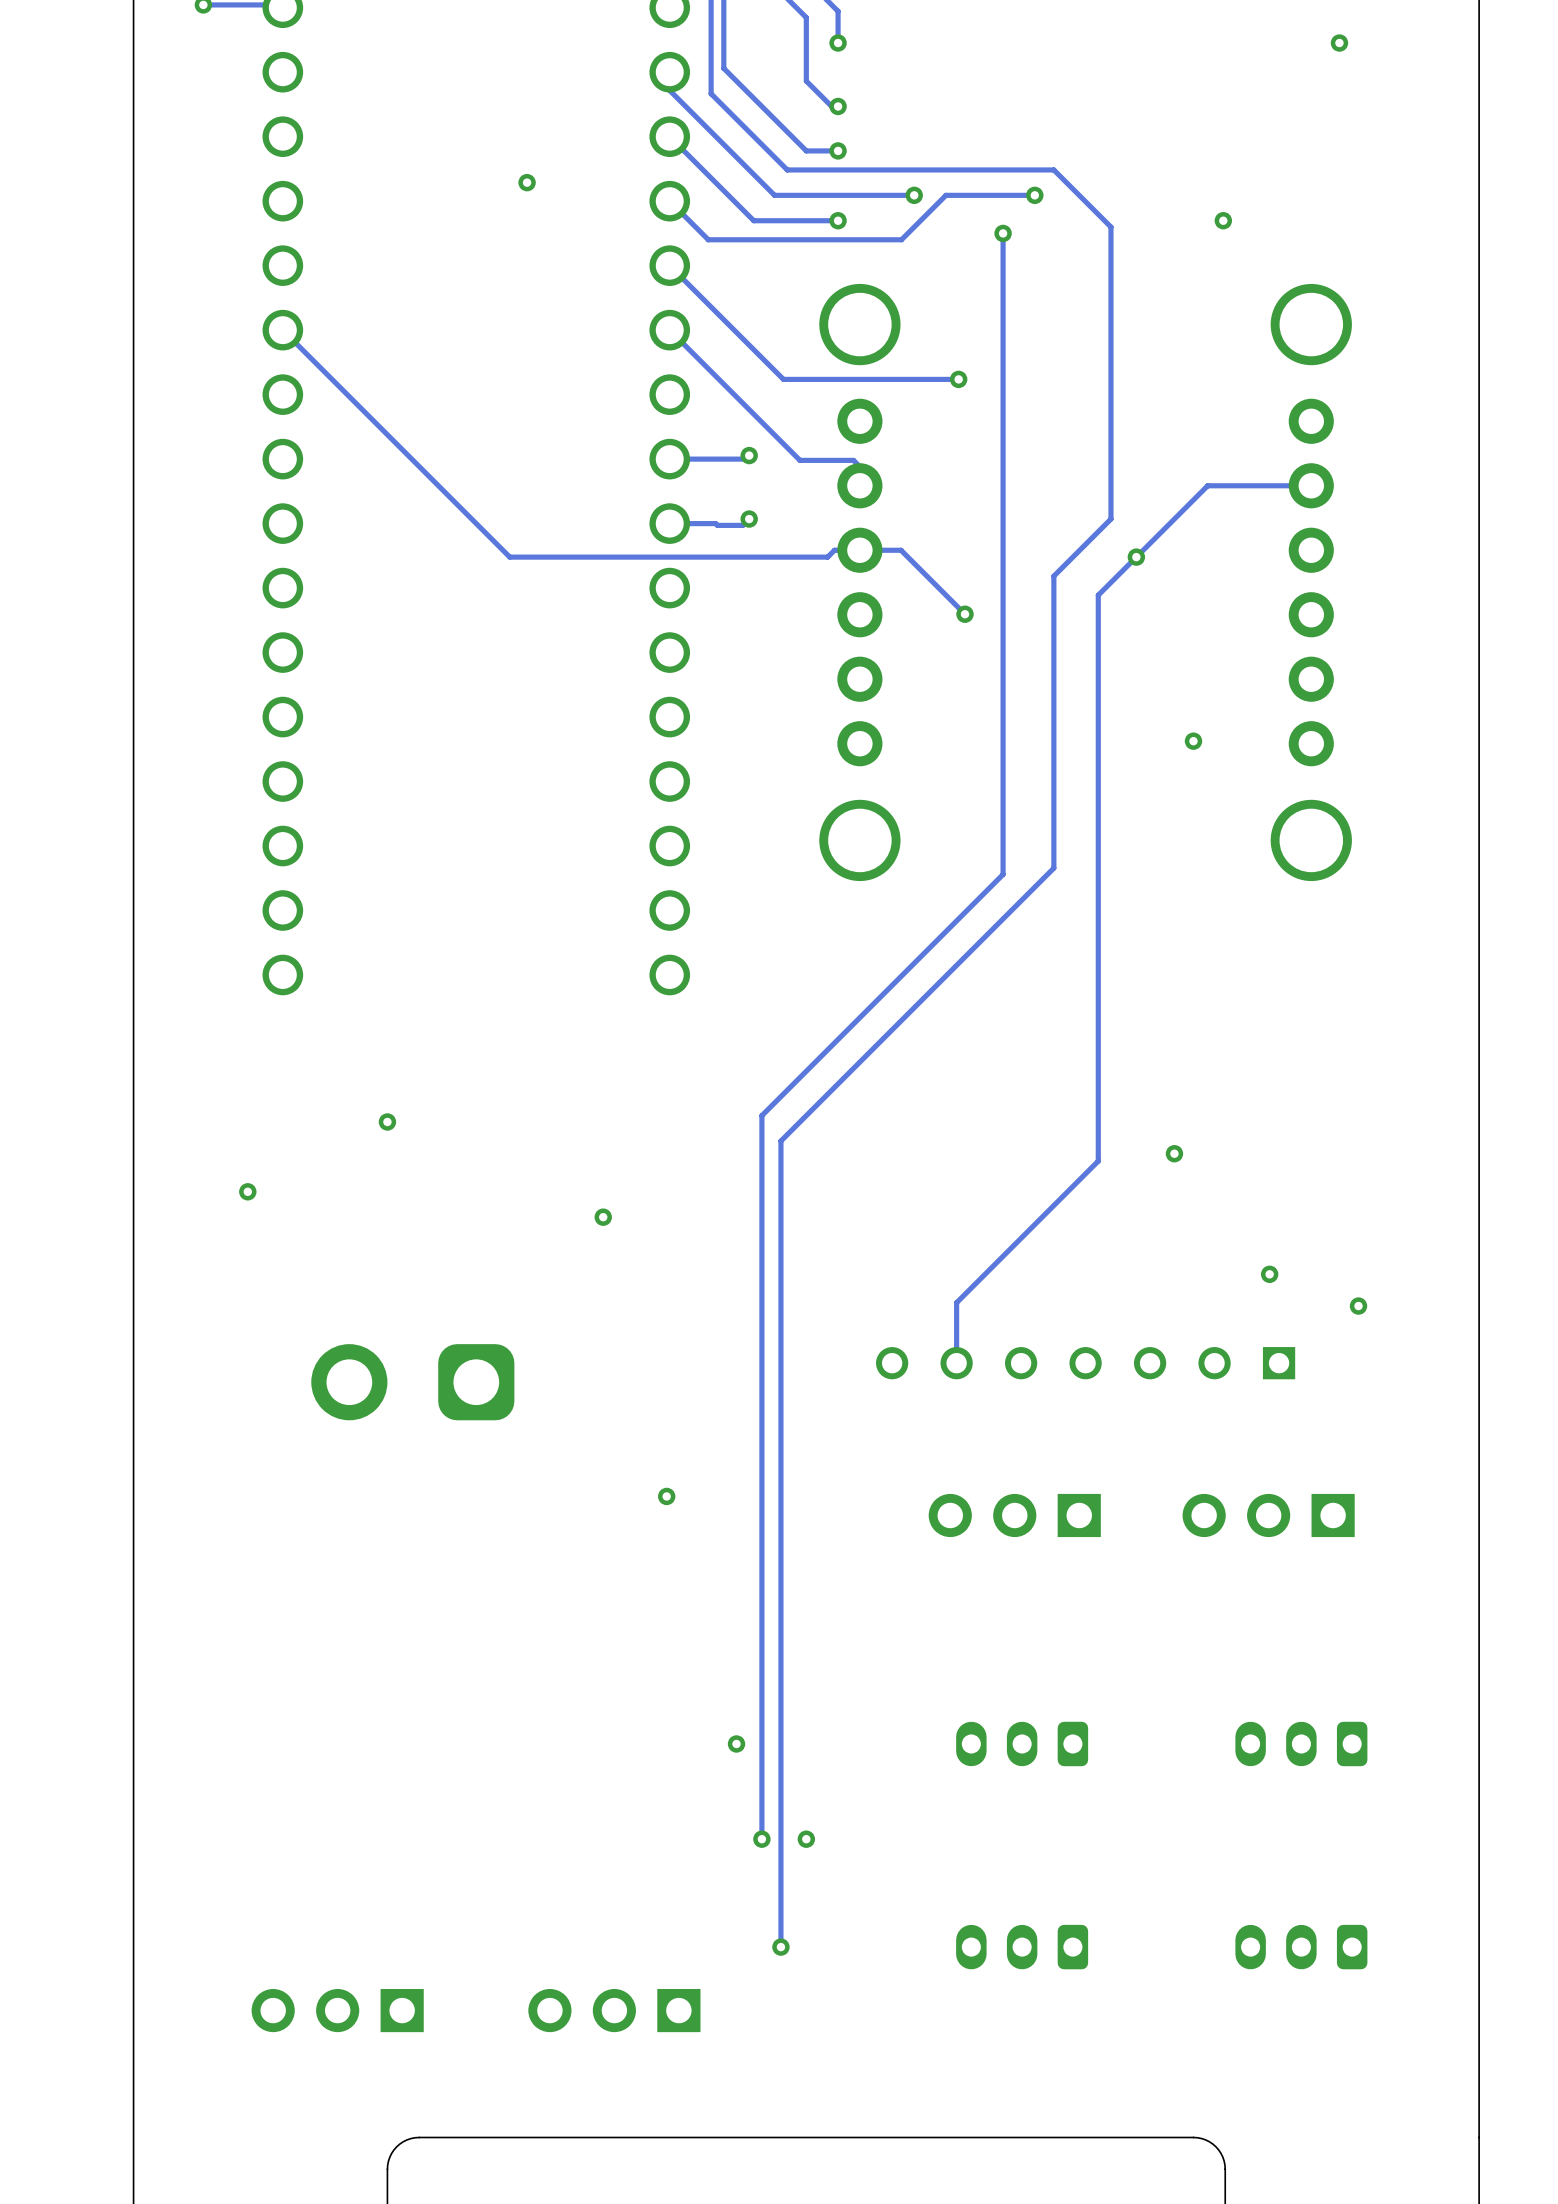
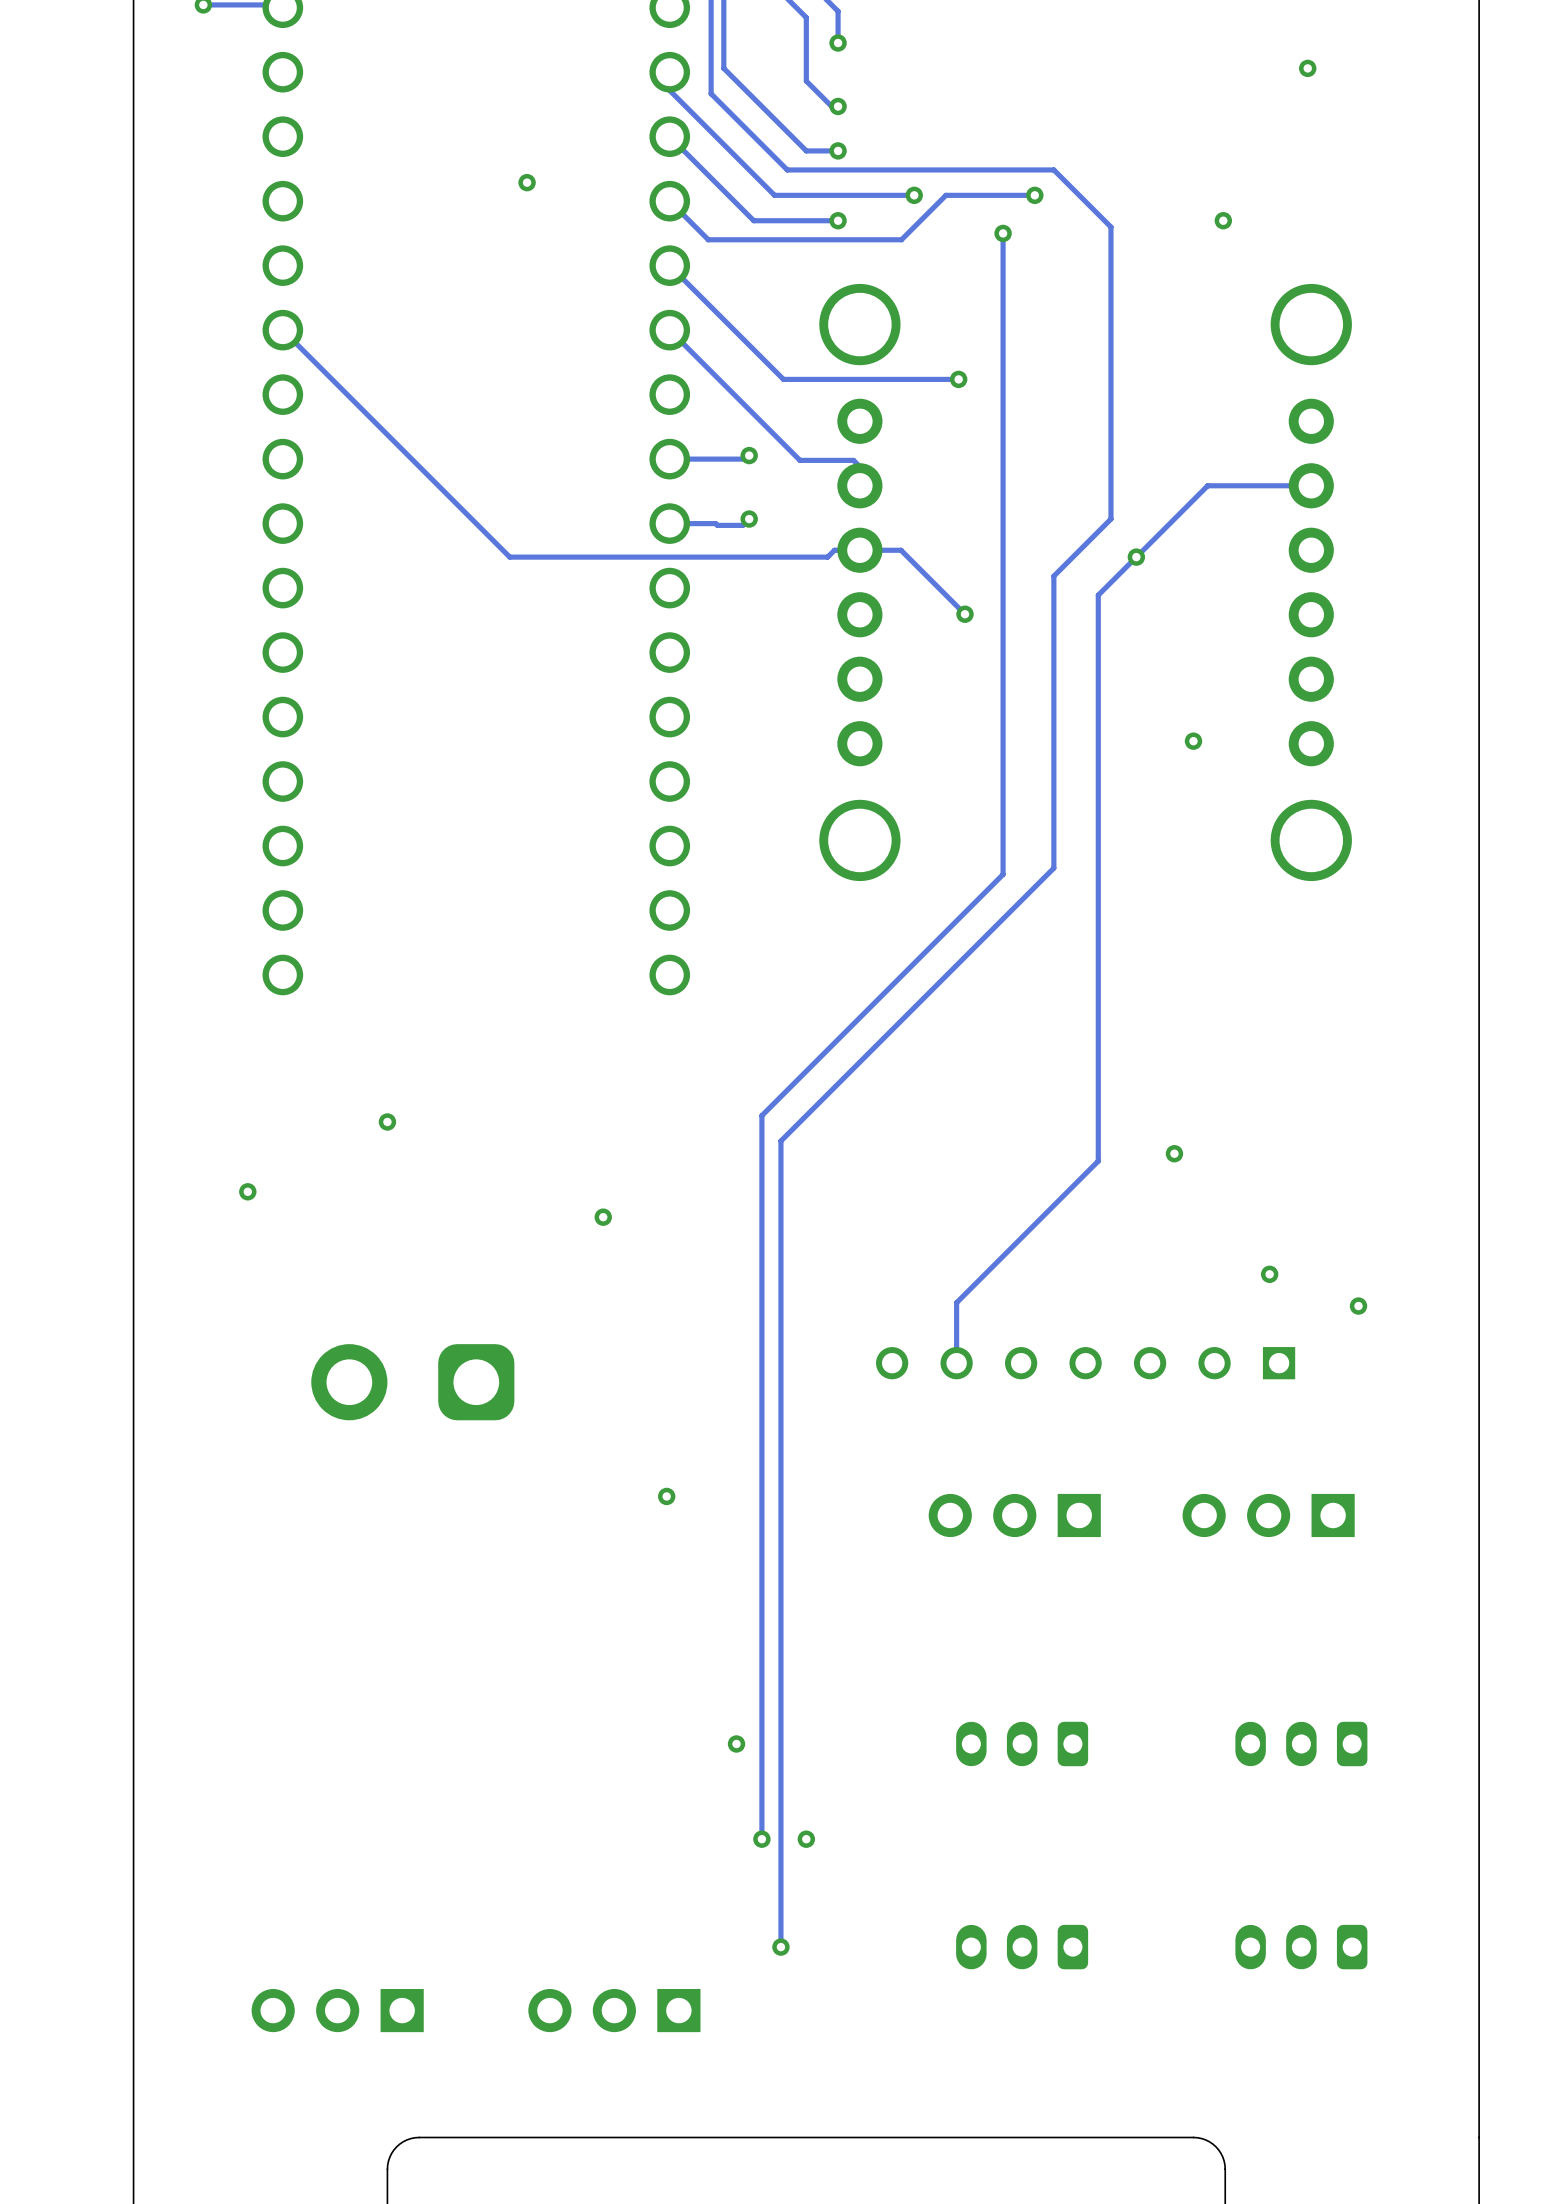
via position: (1339, 43) -> (1307, 68)

